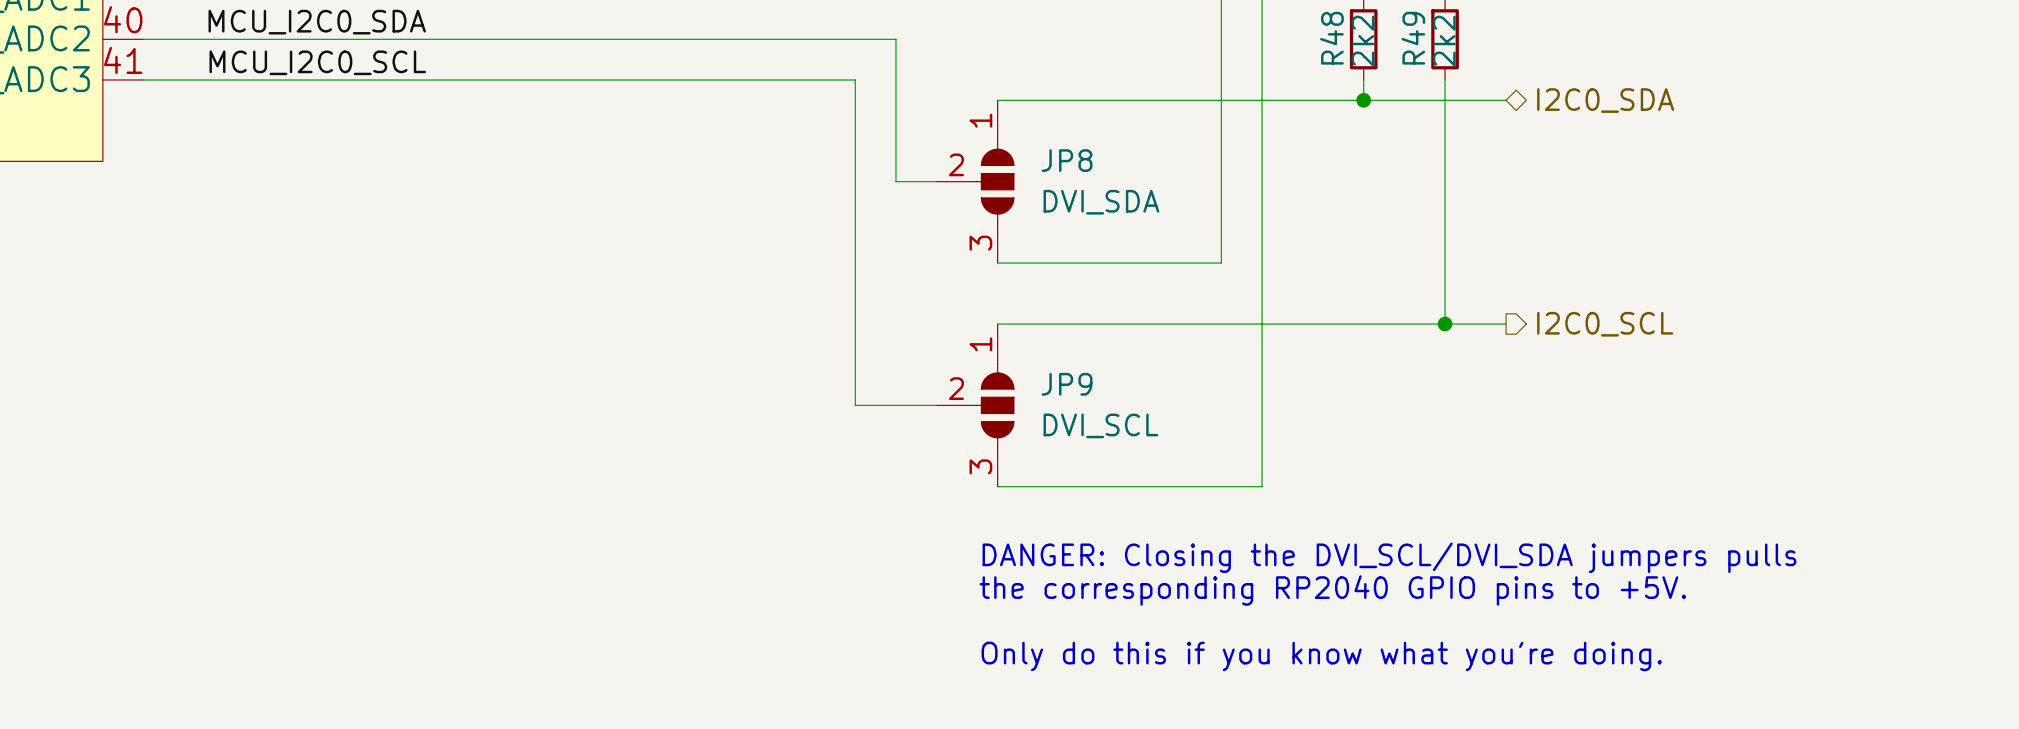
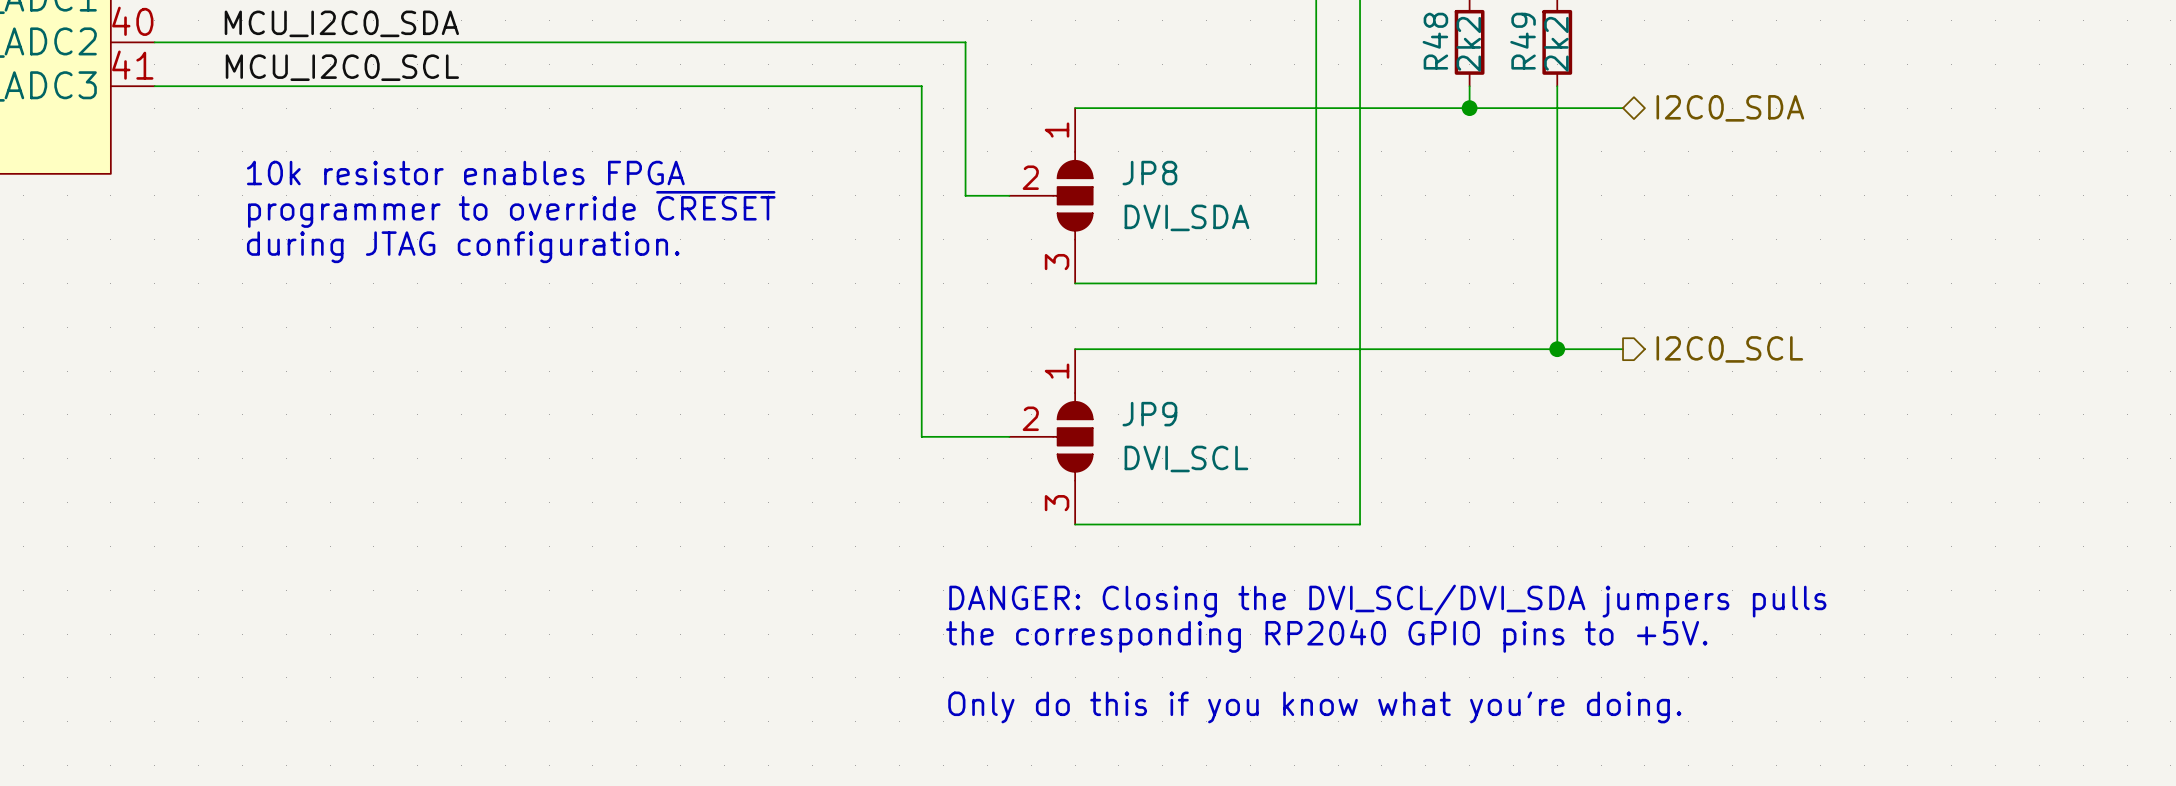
text: none -> 10k resistor enables FPGA (465, 173)
text: none -> programmer to override ~{CRESET} (511, 209)
text: none -> during JTAG configuration. (463, 247)
text position: DANGER: Closing the DVI_SCL/DVI_SDA jumpers pulls (1389, 557) -> DANGER: Closing the DVI_SCL/DVI_SDA jumpers pulls (1387, 601)
text position: the corresponding RP2040 GPIO pins to +5V. (1332, 590) -> the corresponding RP2040 GPIO pins to +5V. (1326, 636)
text position: Only do this if you know what you're doing. (1321, 656) -> Only do this if you know what you're doing. (1314, 707)

